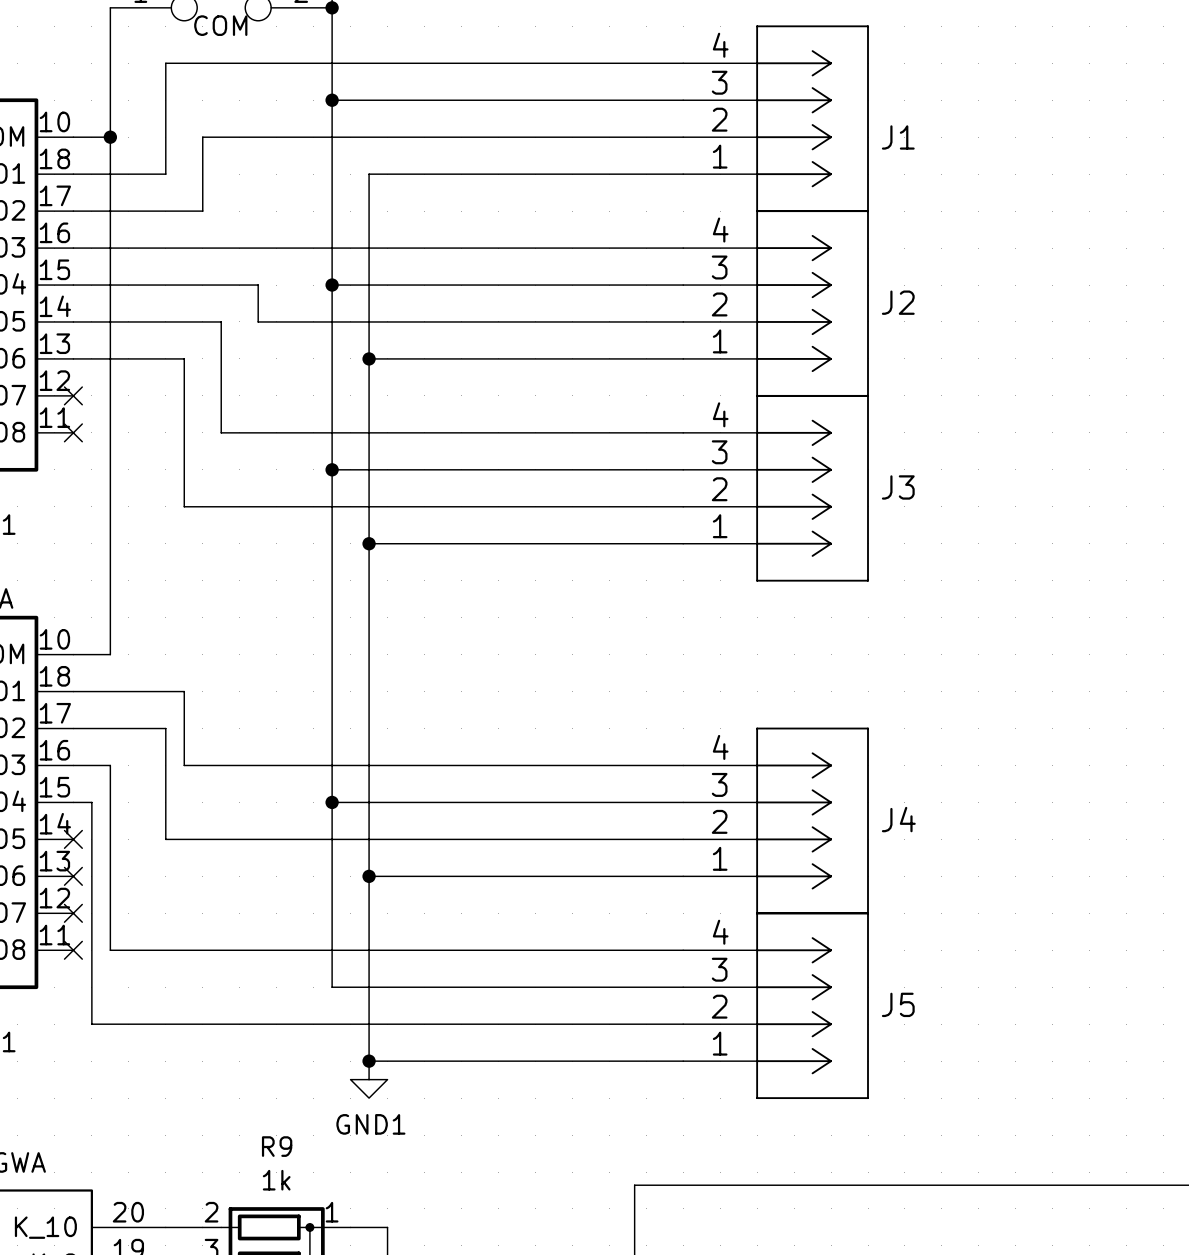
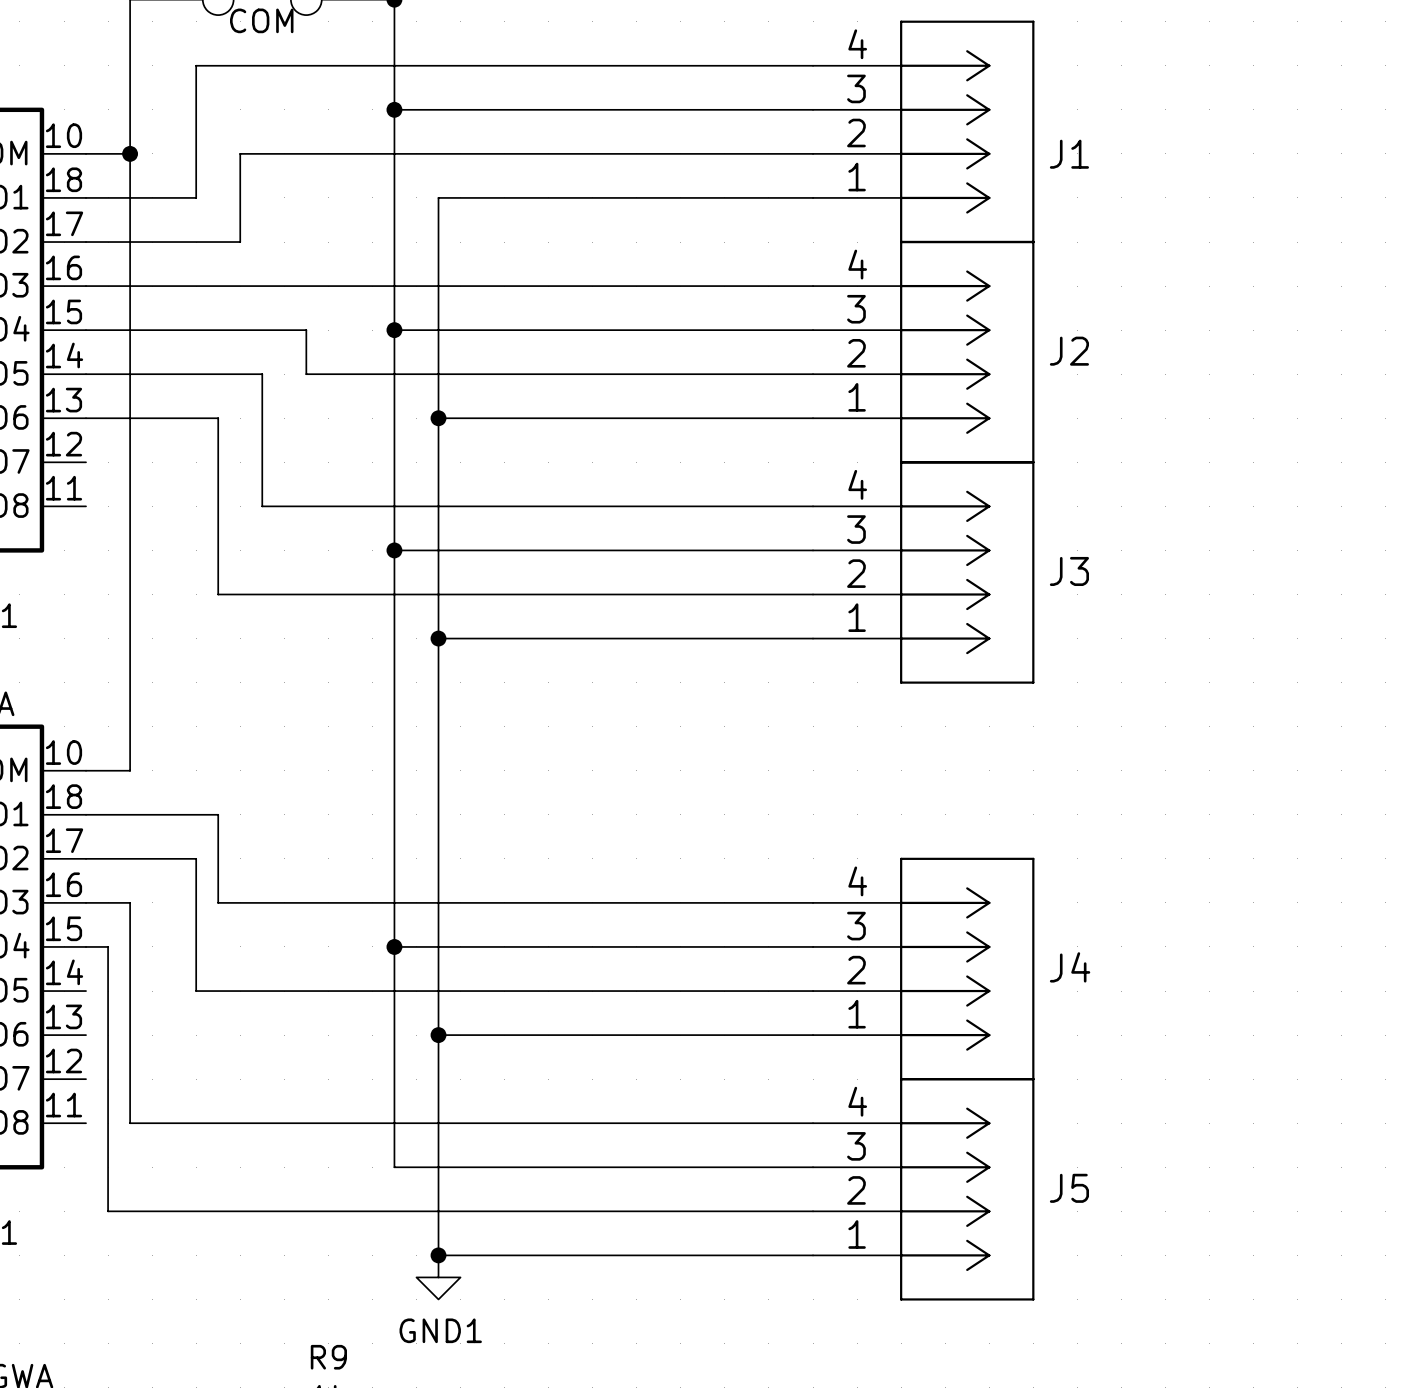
no-connect mark: (73, 395) -> none
no-connect mark: (73, 432) -> none
no-connect mark: (73, 839) -> none
no-connect mark: (73, 876) -> none
no-connect mark: (73, 913) -> none
no-connect mark: (73, 950) -> none

